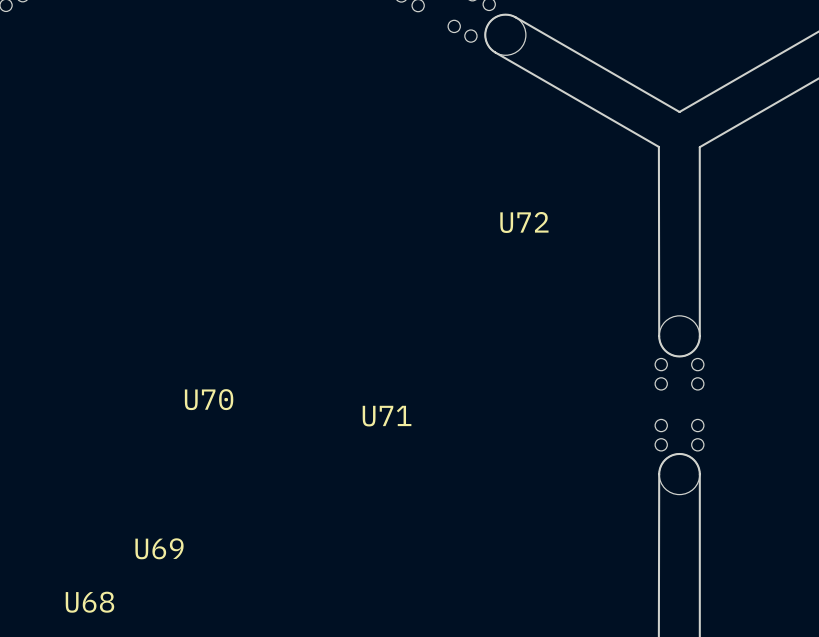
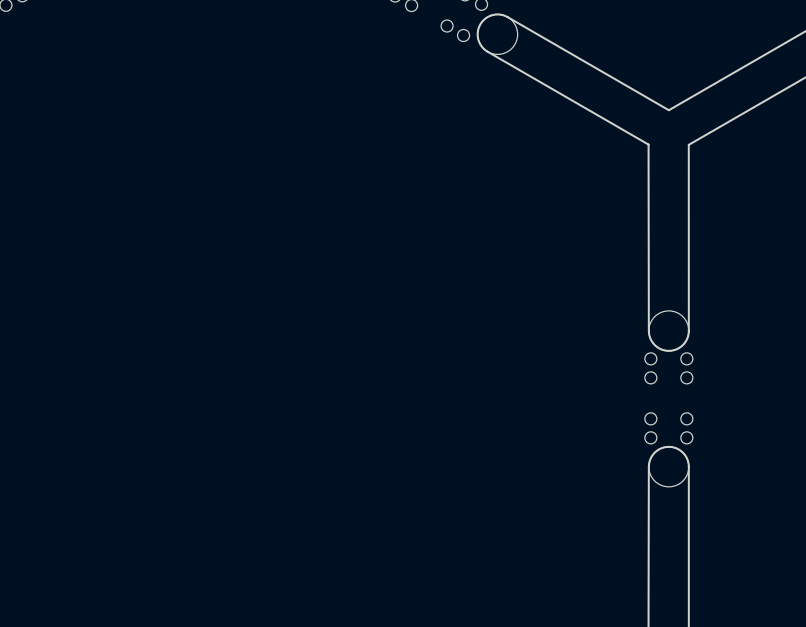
U72: (524, 222) -> none
U70: (209, 399) -> none
U71: (387, 416) -> none
U69: (159, 548) -> none
U68: (89, 602) -> none

